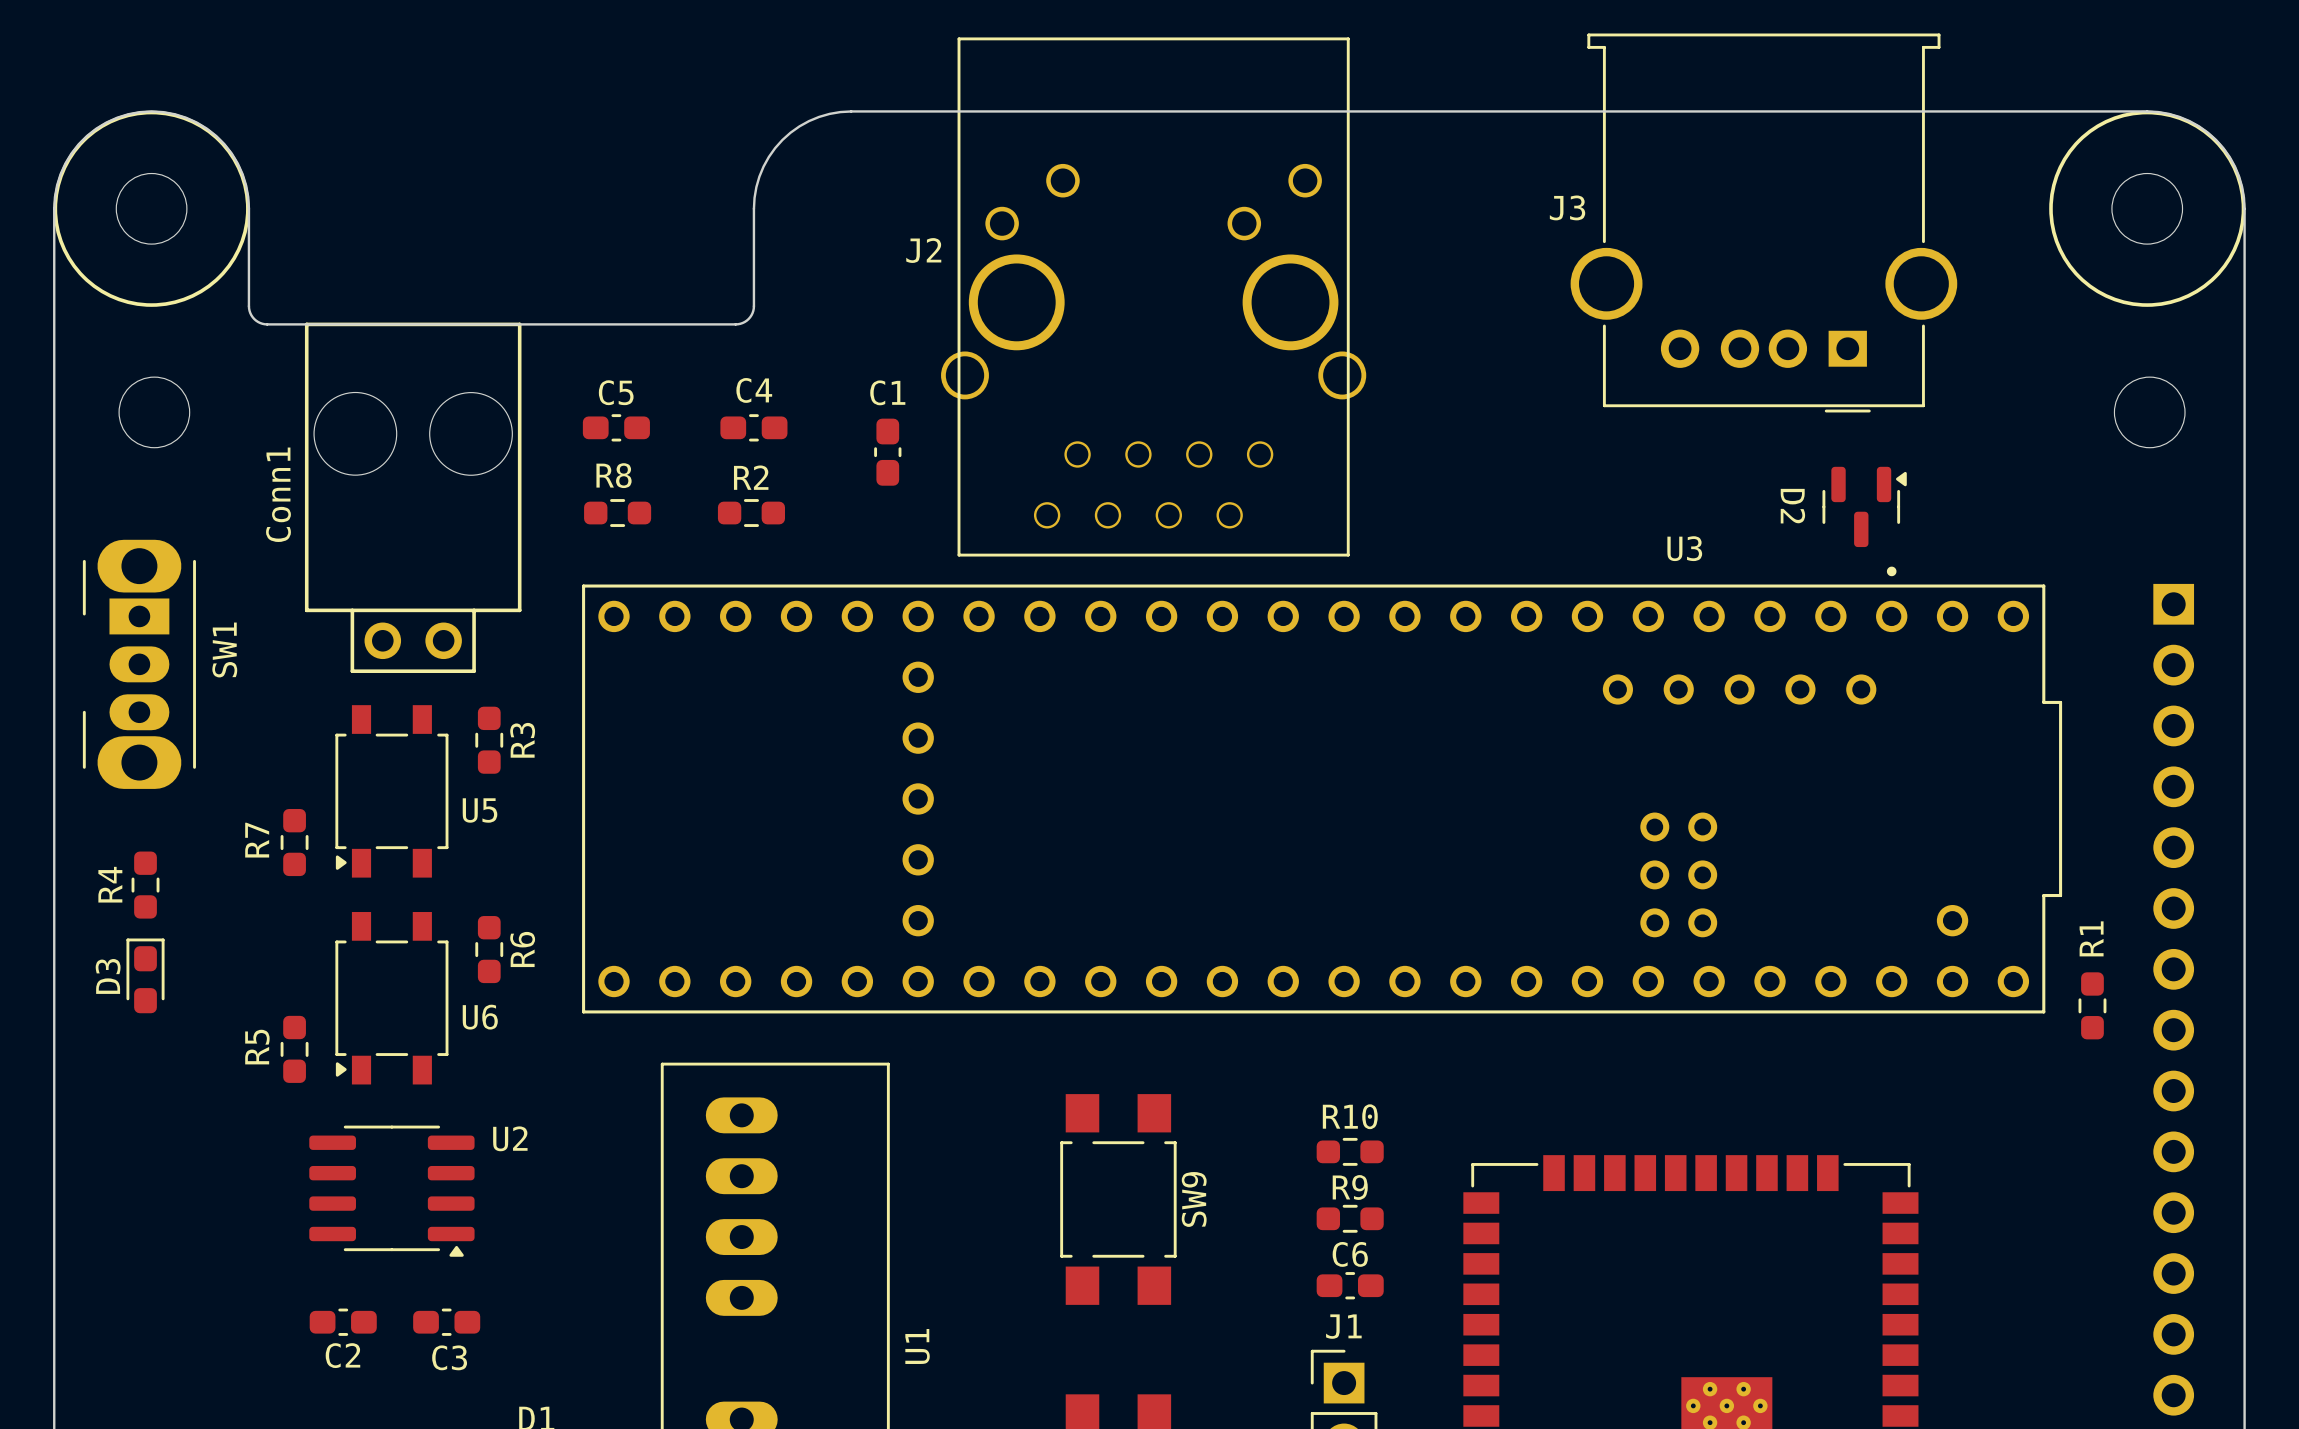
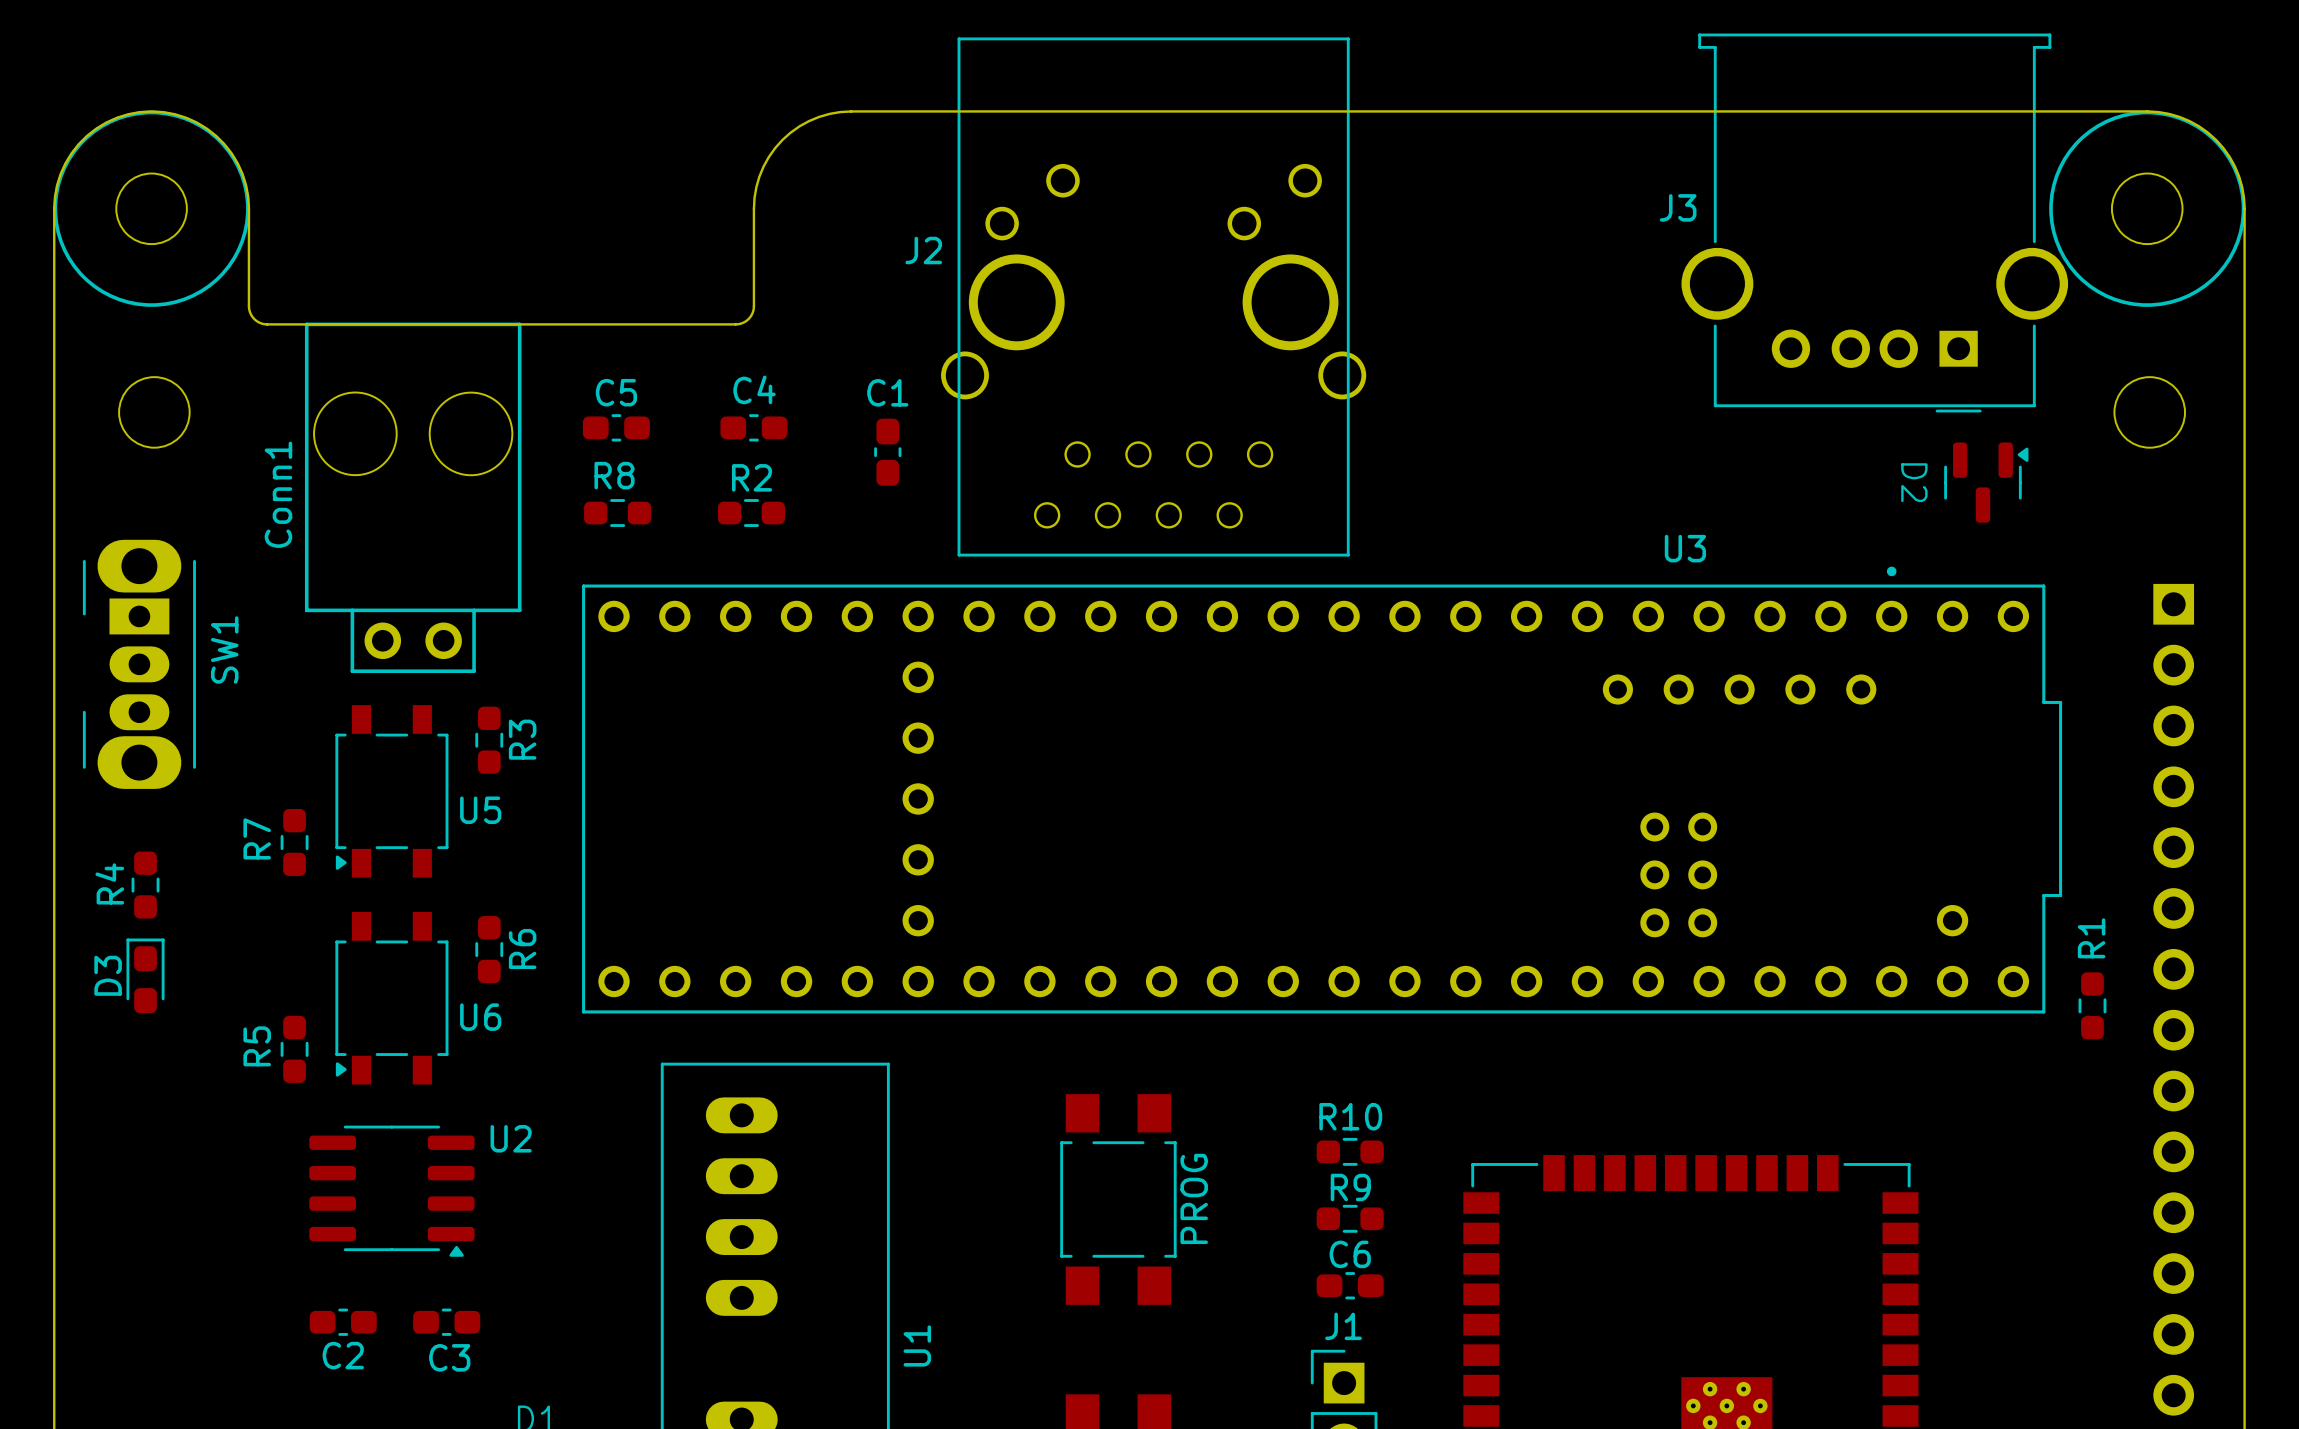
J3 position: (1763, 222) -> (1874, 222)
D2 position: (1864, 506) -> (1986, 482)
SW9 name: SW9 (1194, 1199) -> PROG (1194, 1198)

